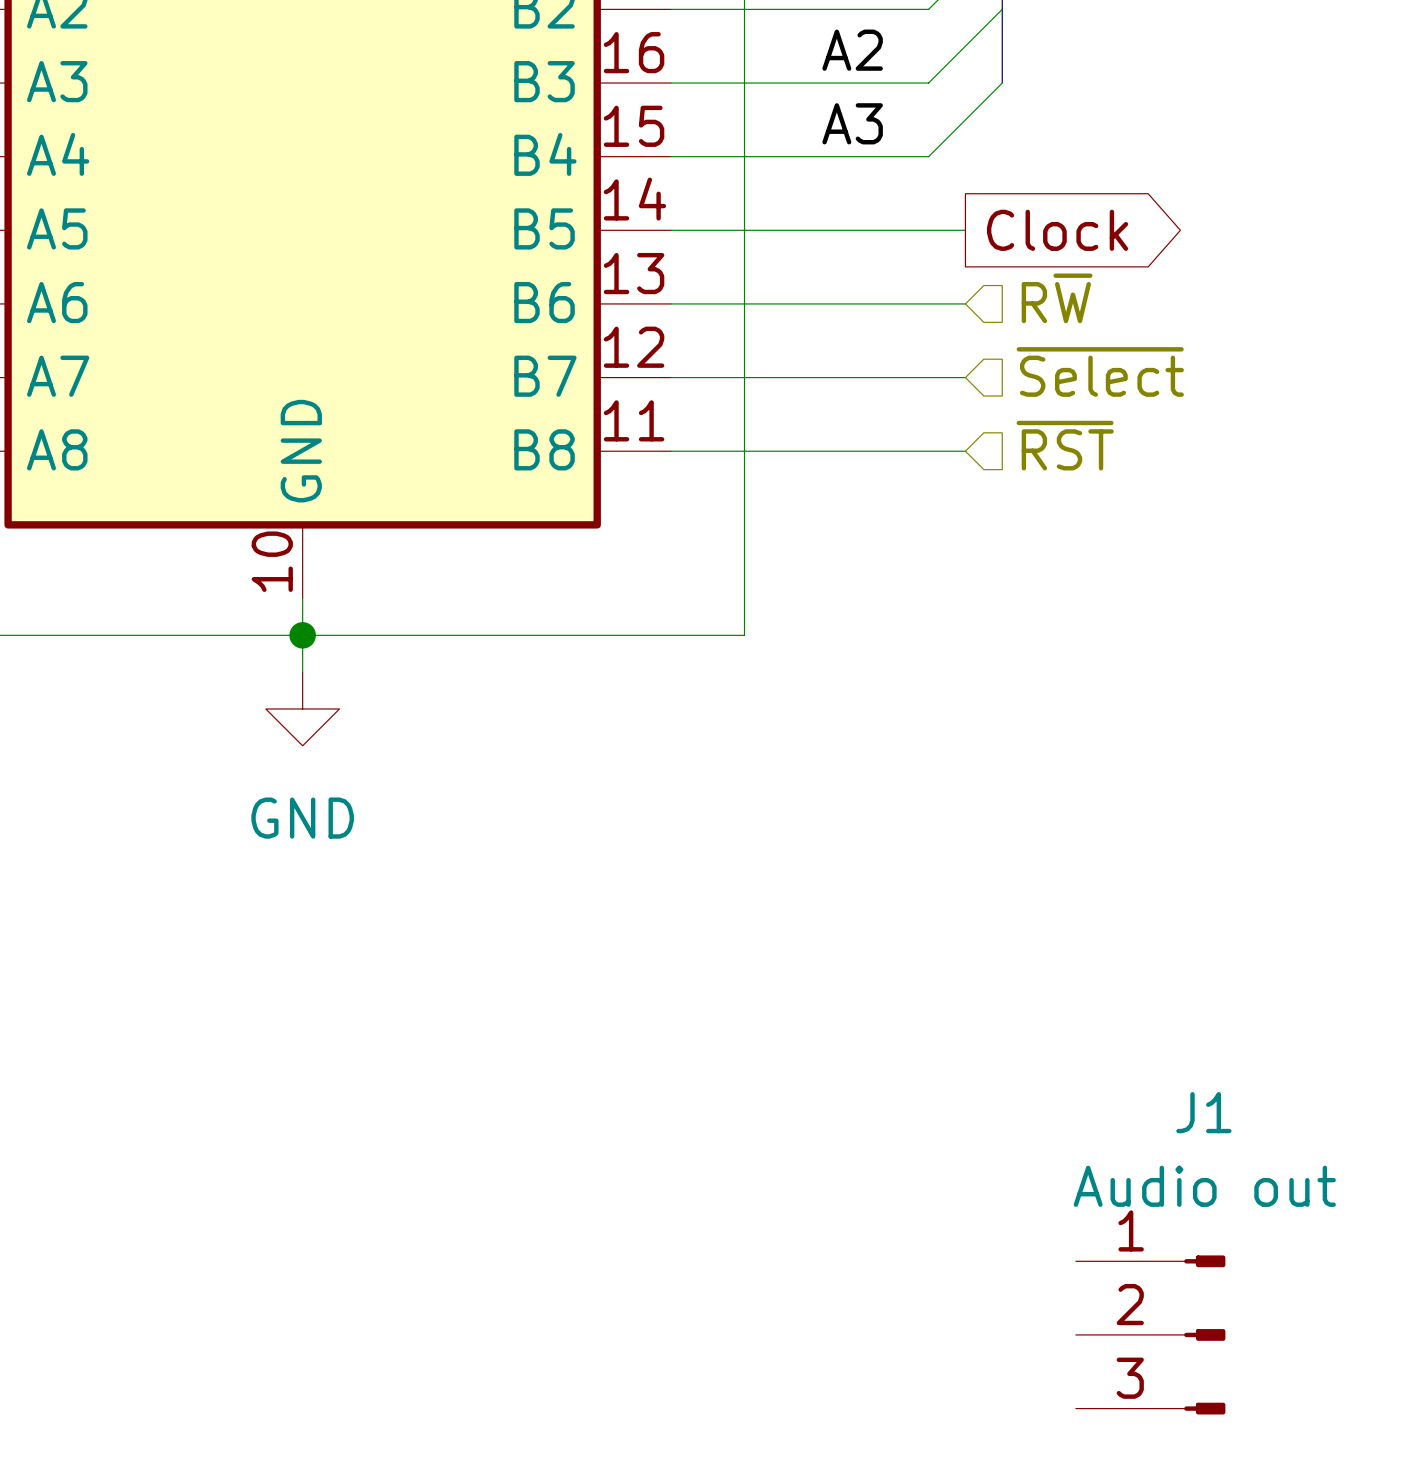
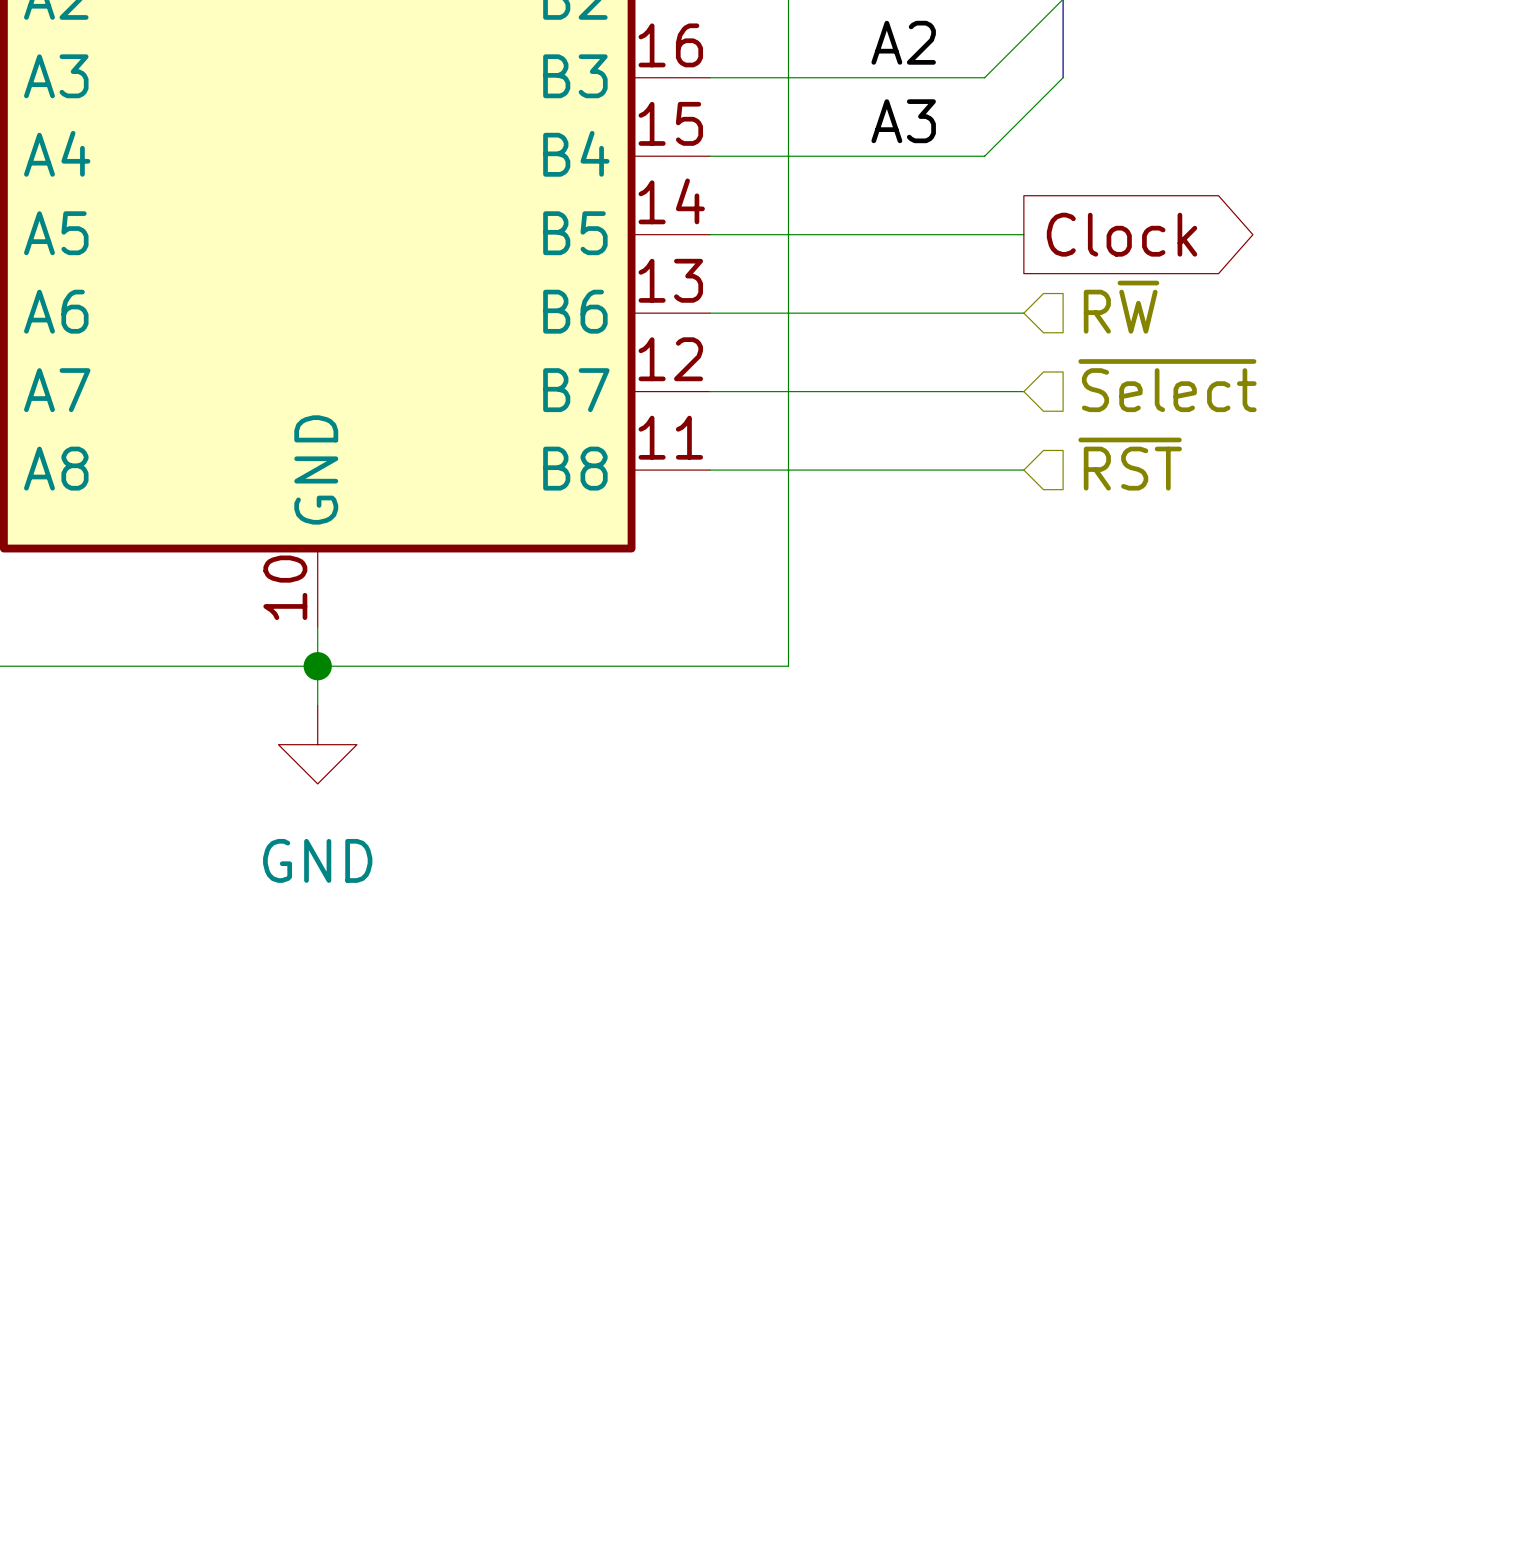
J1: Audio out (1150, 1334) -> none

